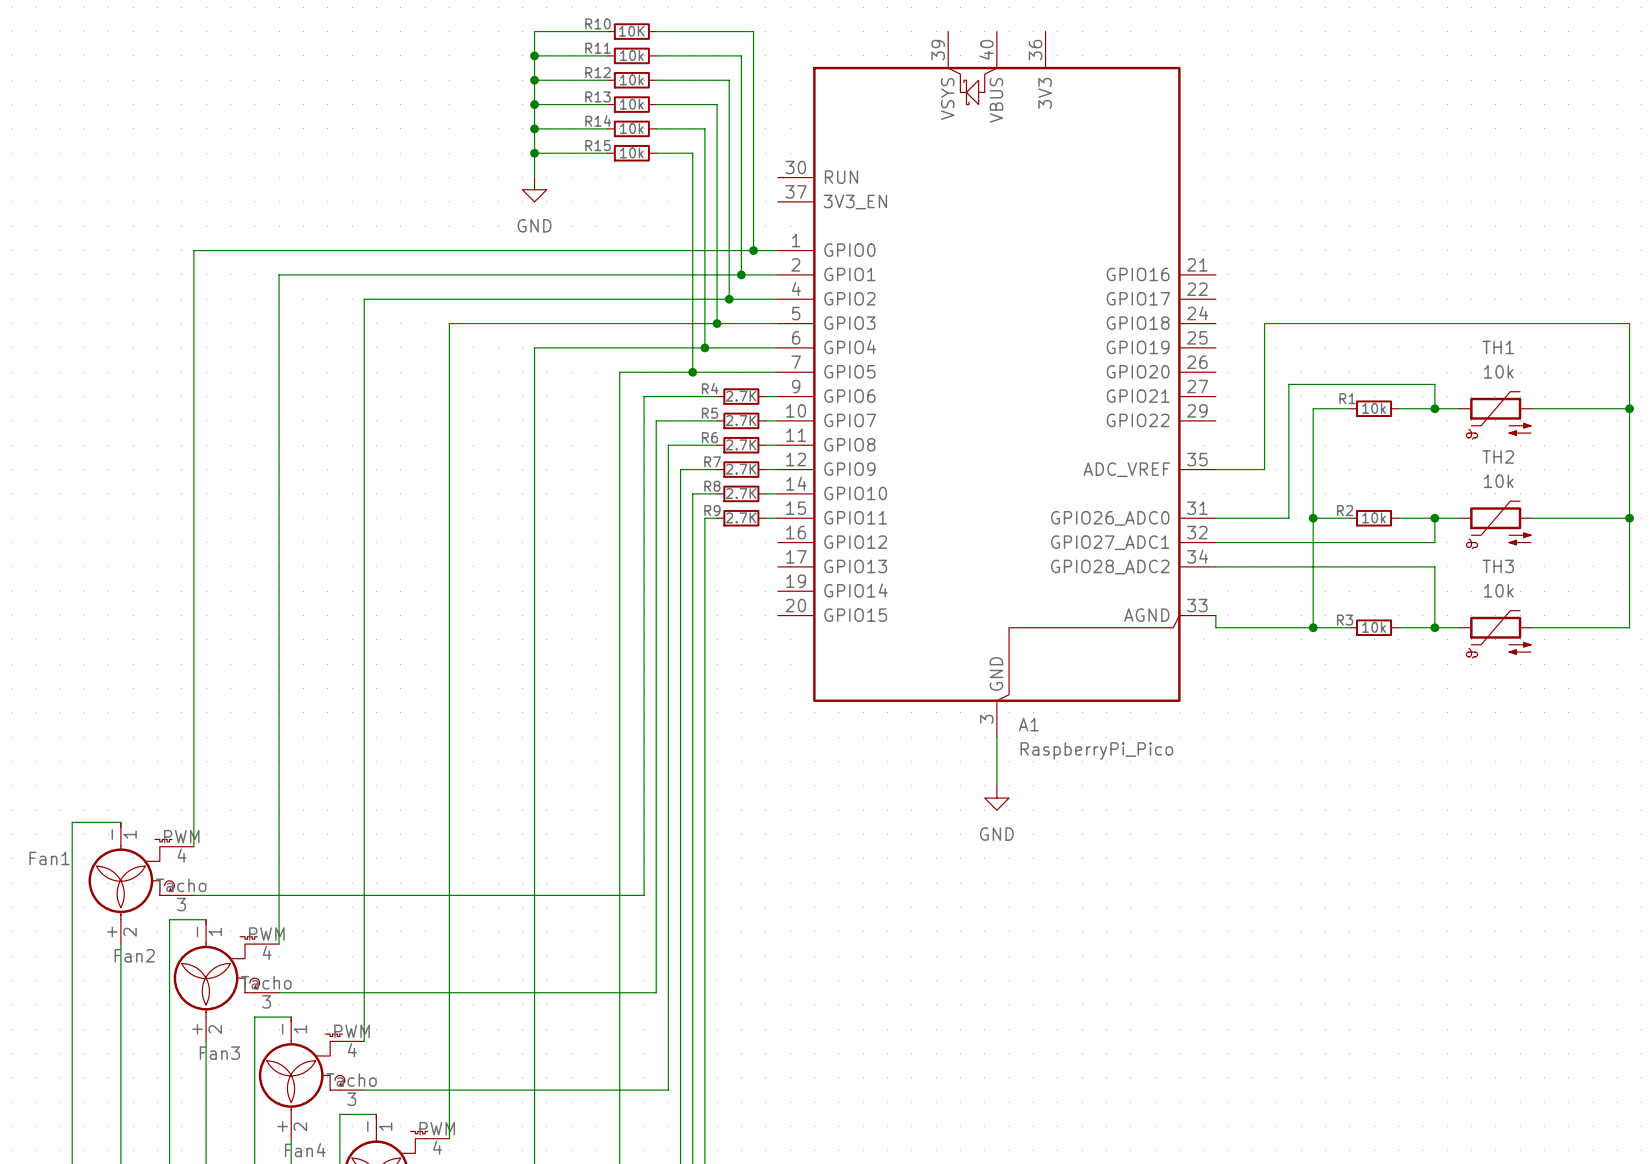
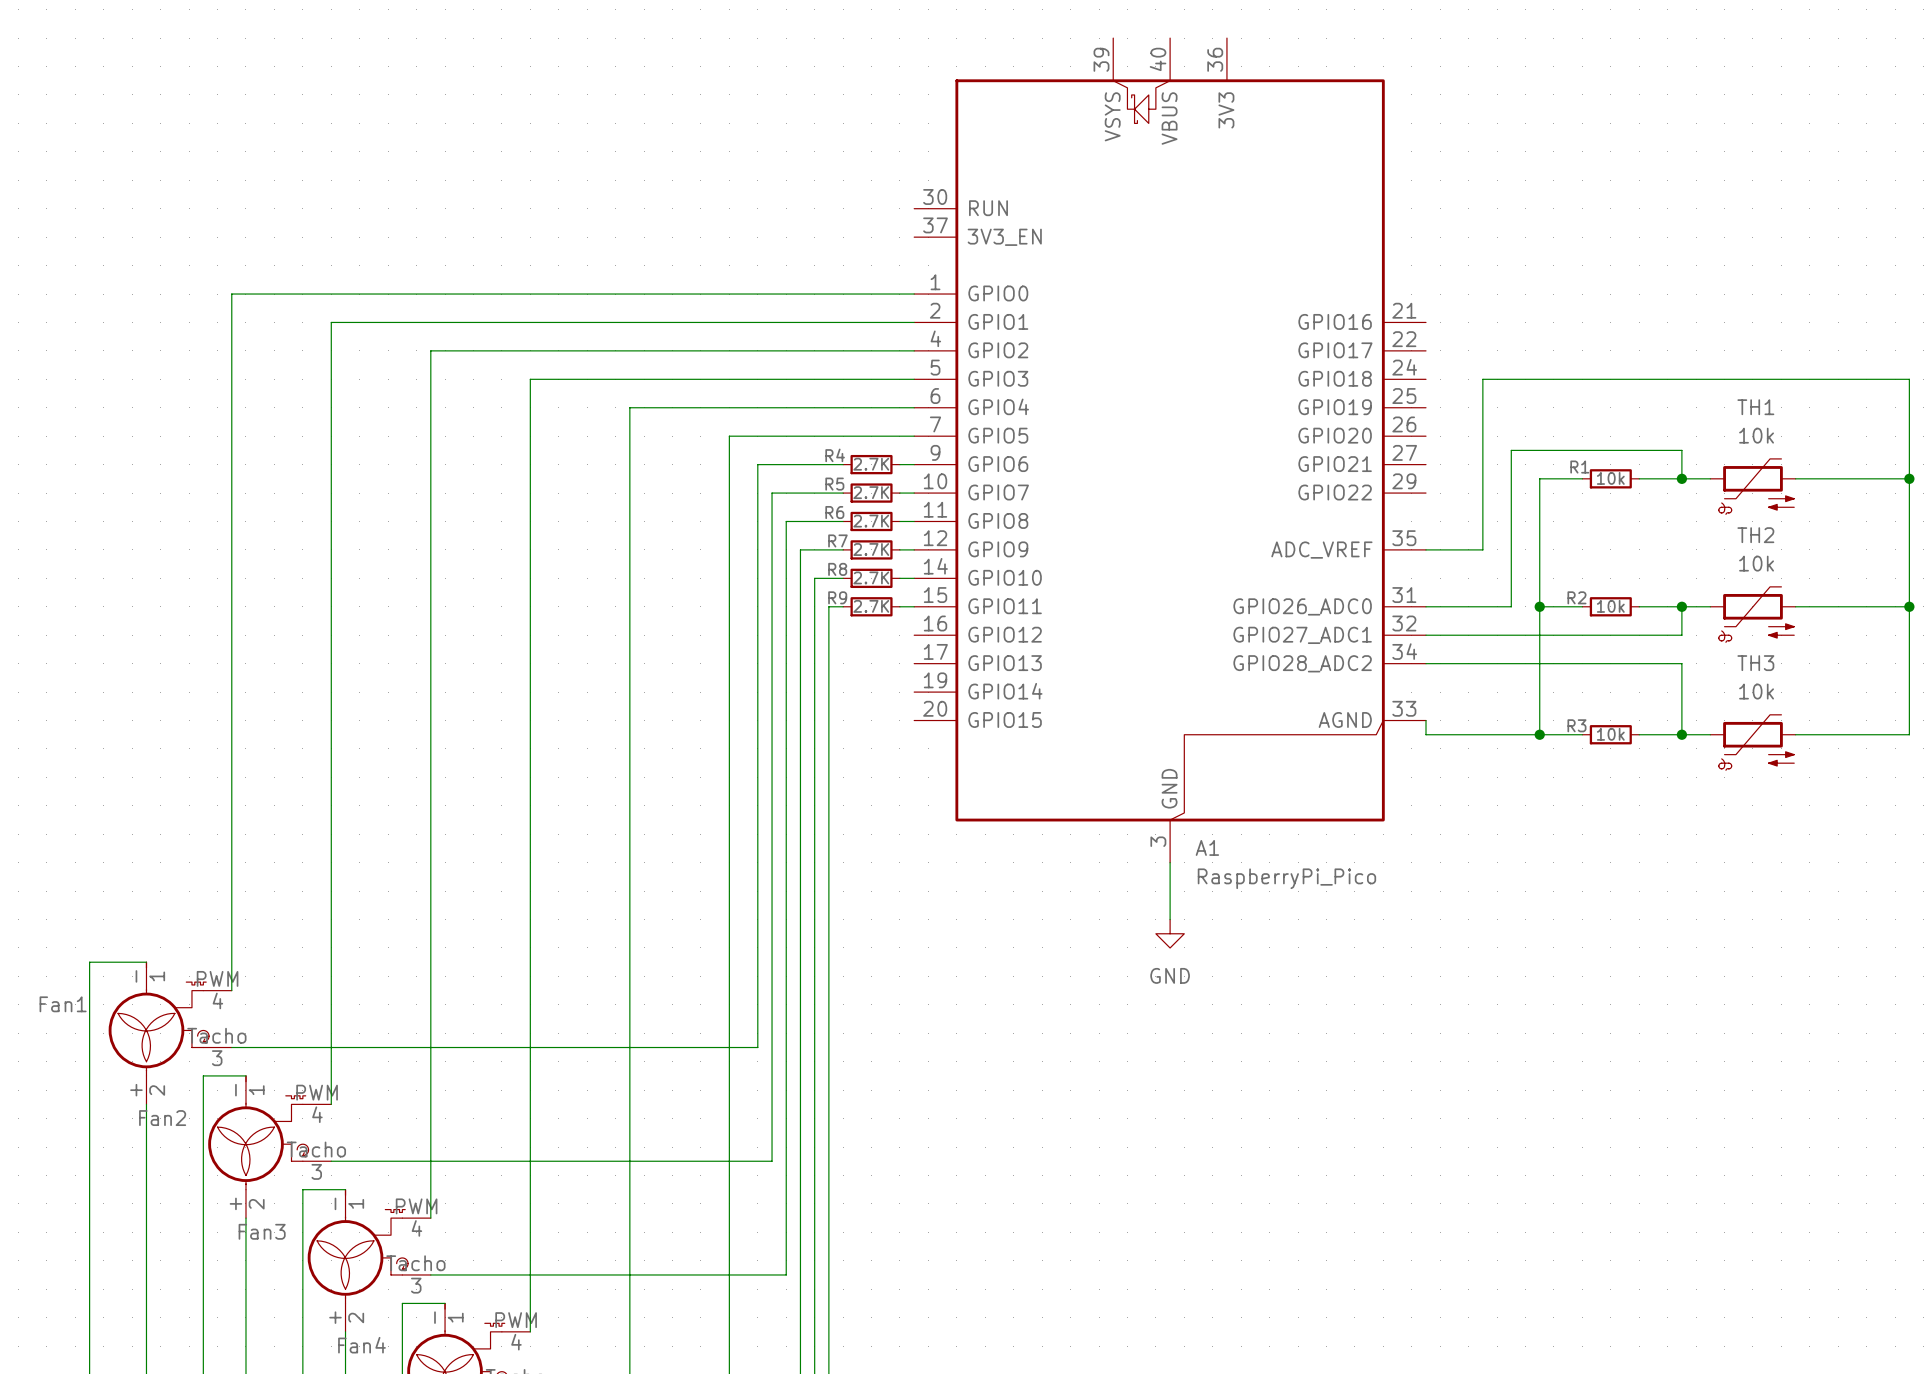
wire: (607, 31) (534, 31) (534, 177) -> none
R10: 10K (631, 31) -> none
wire: (656, 31) (753, 31) (753, 250) -> none
wire: (534, 55) (607, 55) -> none
junction: (534, 55) -> none
R11: 10k (631, 55) -> none
wire: (656, 55) (741, 55) (741, 274) -> none
wire: (534, 80) (607, 80) -> none
junction: (534, 80) -> none
R12: 10k (631, 80) -> none
wire: (656, 80) (729, 80) (729, 299) -> none
wire: (534, 104) (607, 104) -> none
junction: (534, 104) -> none
R13: 10k (631, 104) -> none
wire: (656, 104) (717, 104) (717, 323) -> none
wire: (534, 128) (607, 128) -> none
junction: (534, 128) -> none
R14: 10k (631, 128) -> none
wire: (656, 128) (704, 128) (704, 347) -> none
wire: (534, 153) (607, 153) -> none
junction: (534, 153) -> none
R15: 10k (631, 153) -> none
wire: (656, 153) (692, 153) (692, 372) -> none
power symbol: GND (534, 189) -> none
junction: (753, 250) -> none
junction: (741, 274) -> none
junction: (729, 299) -> none
junction: (717, 323) -> none
junction: (704, 347) -> none
junction: (692, 372) -> none

